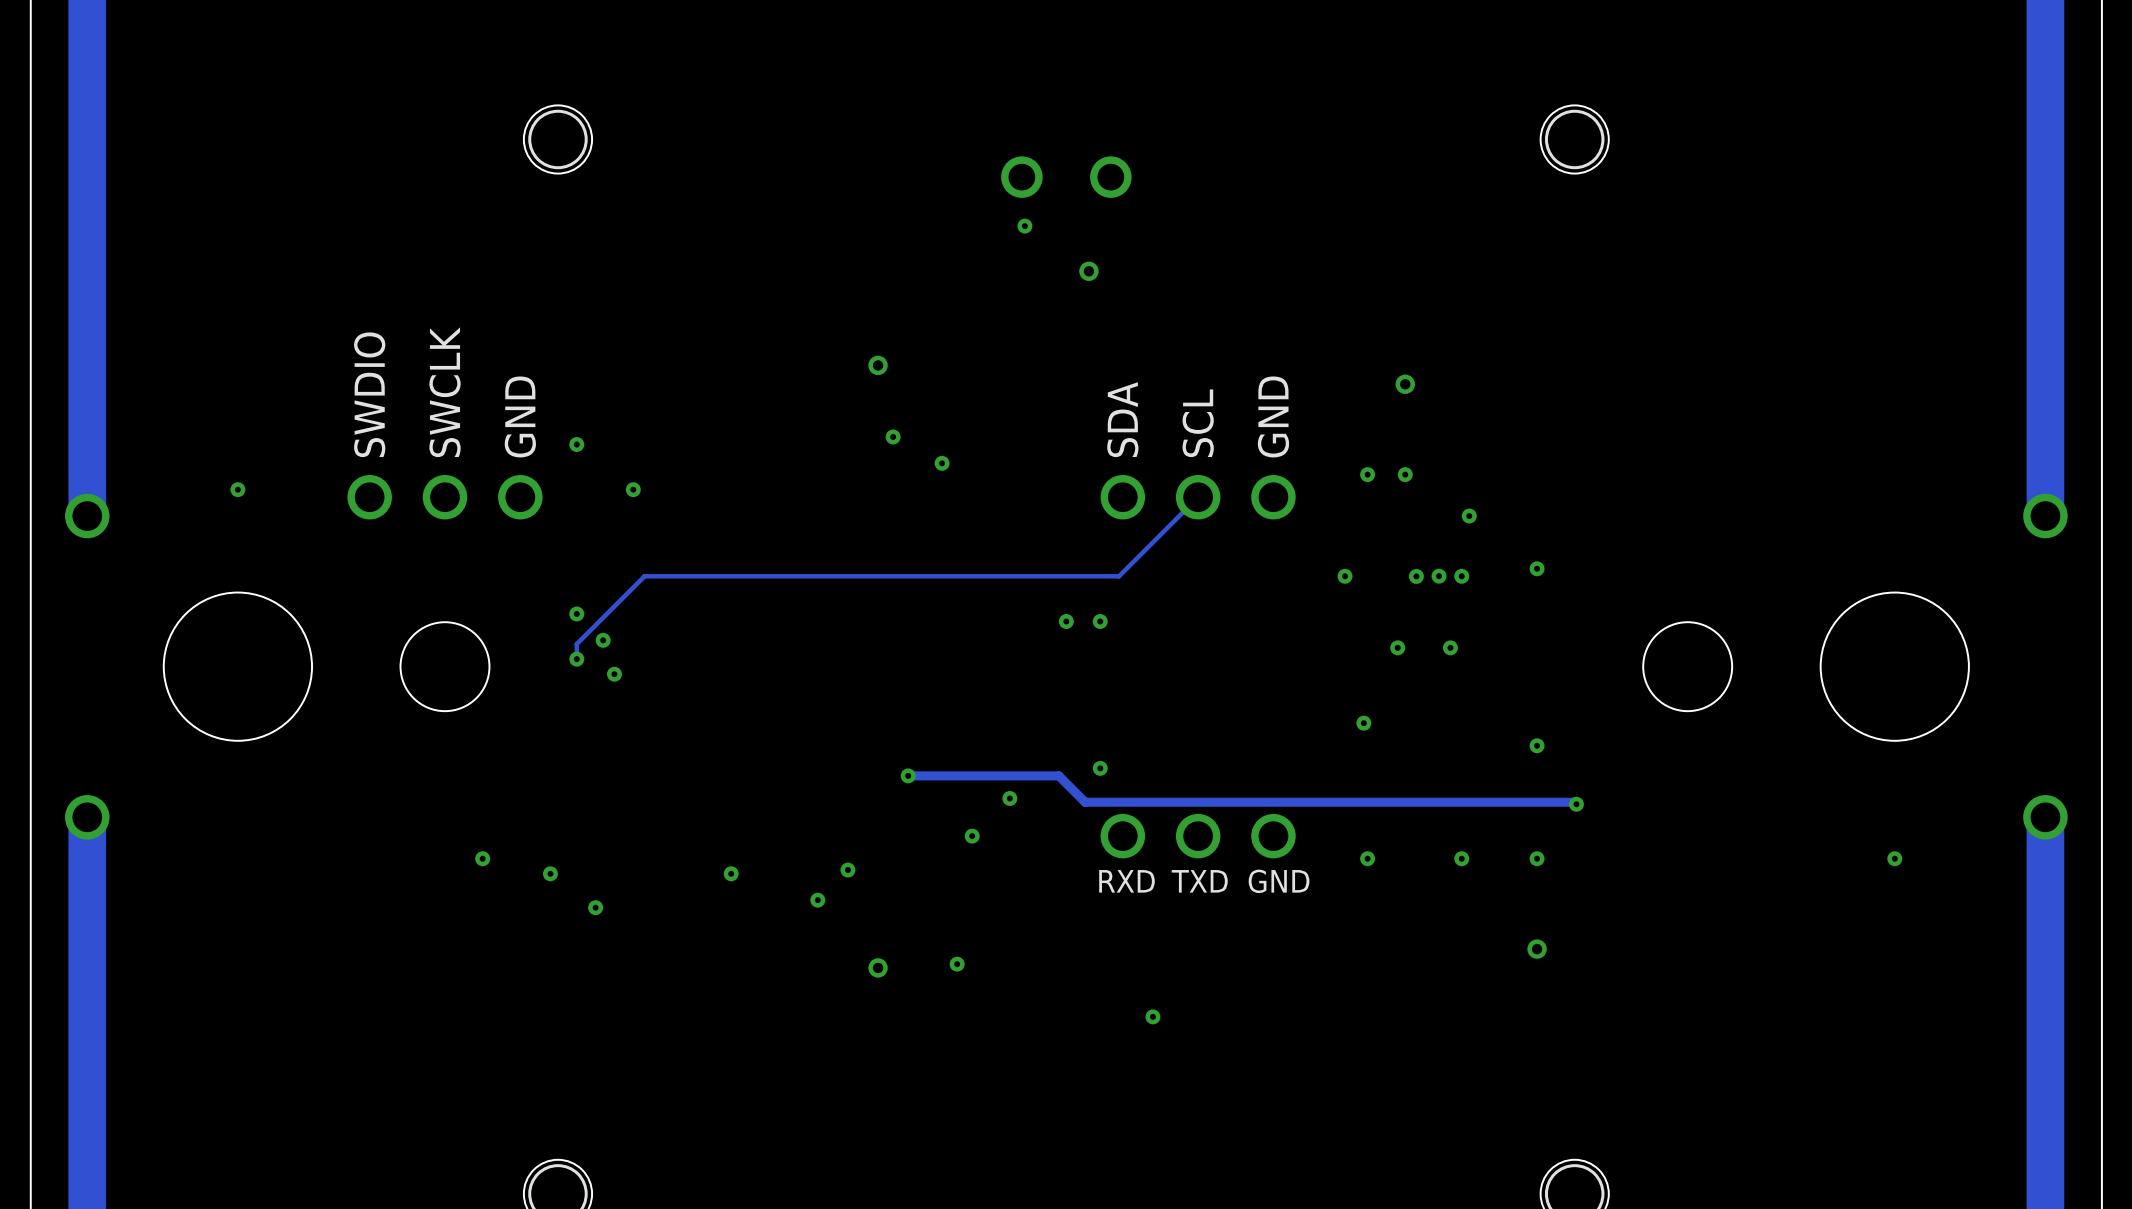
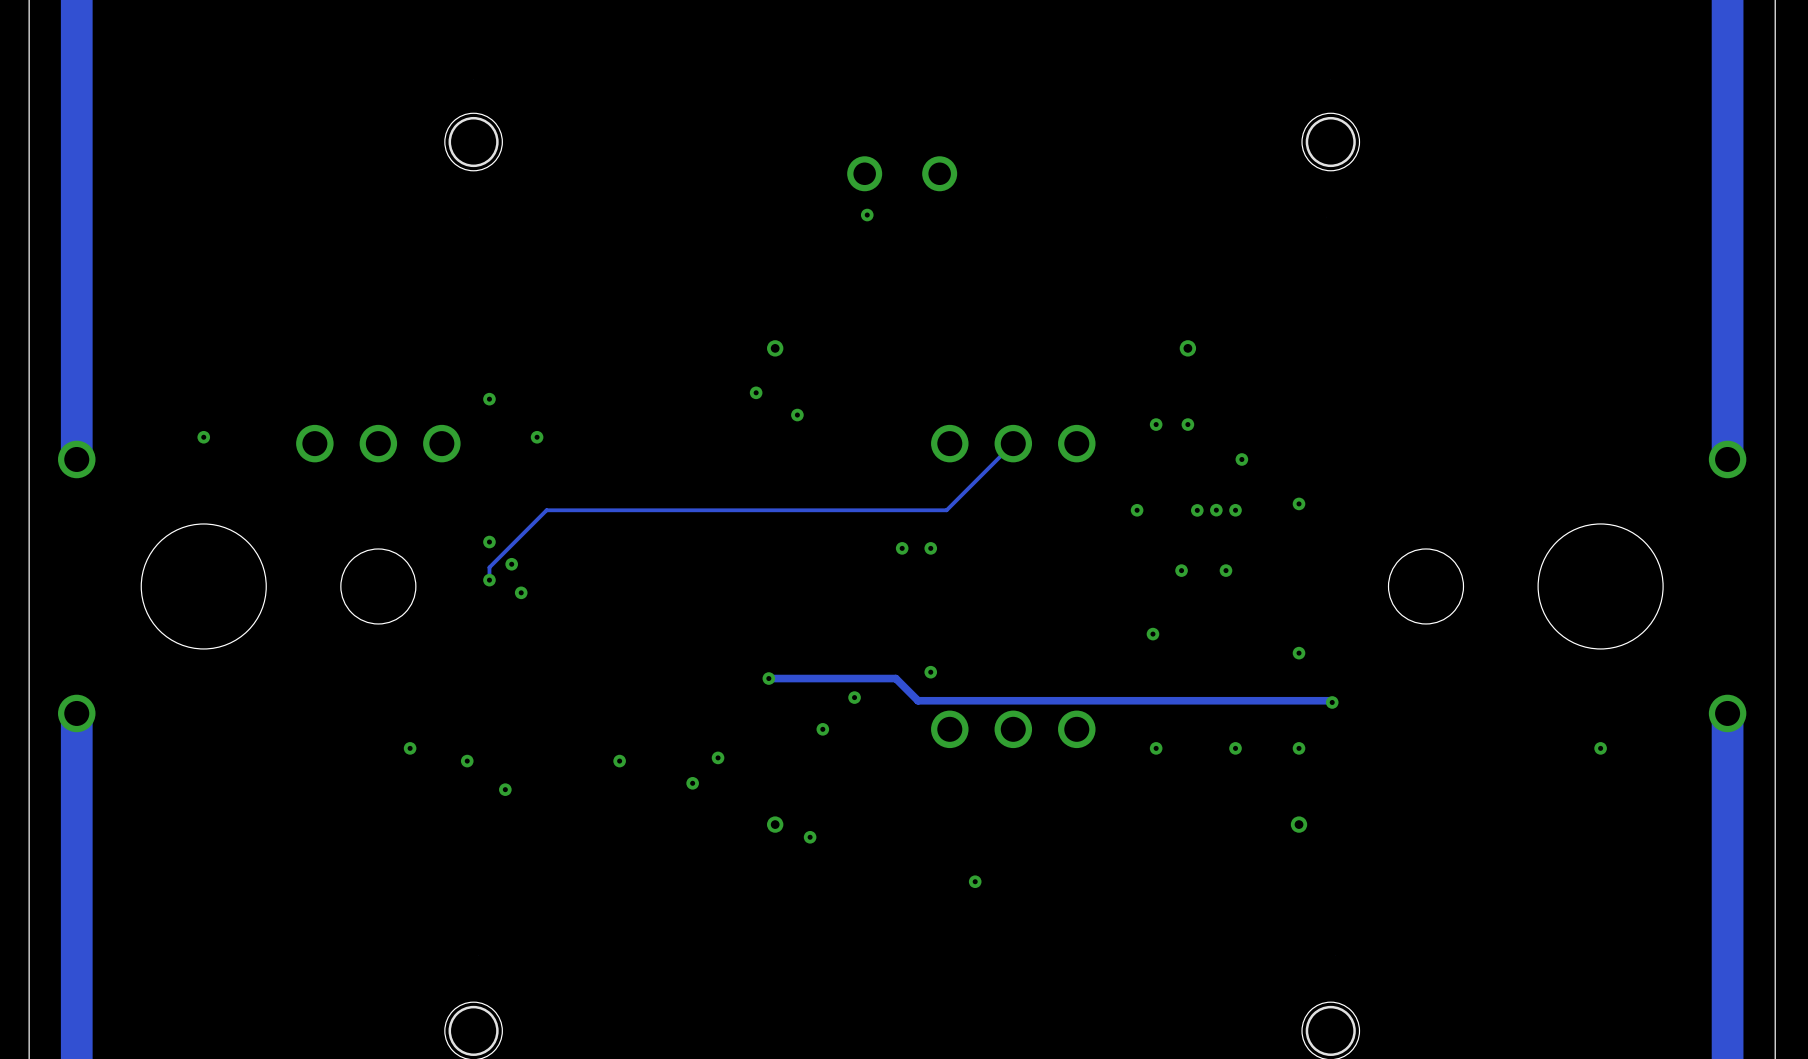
via: (1088, 271) -> none
via position: (878, 365) -> (775, 348)
text: SWCLK (445, 392) -> none
text: SWDIO (369, 394) -> none
text: GND (520, 416) -> none
text: GND (1273, 416) -> none
text: SDA (1122, 419) -> none
text: SCL (1198, 423) -> none
text: RXD (1126, 881) -> none
text: TXD (1199, 881) -> none
text: GND (1279, 881) -> none
via position: (878, 967) -> (775, 824)

